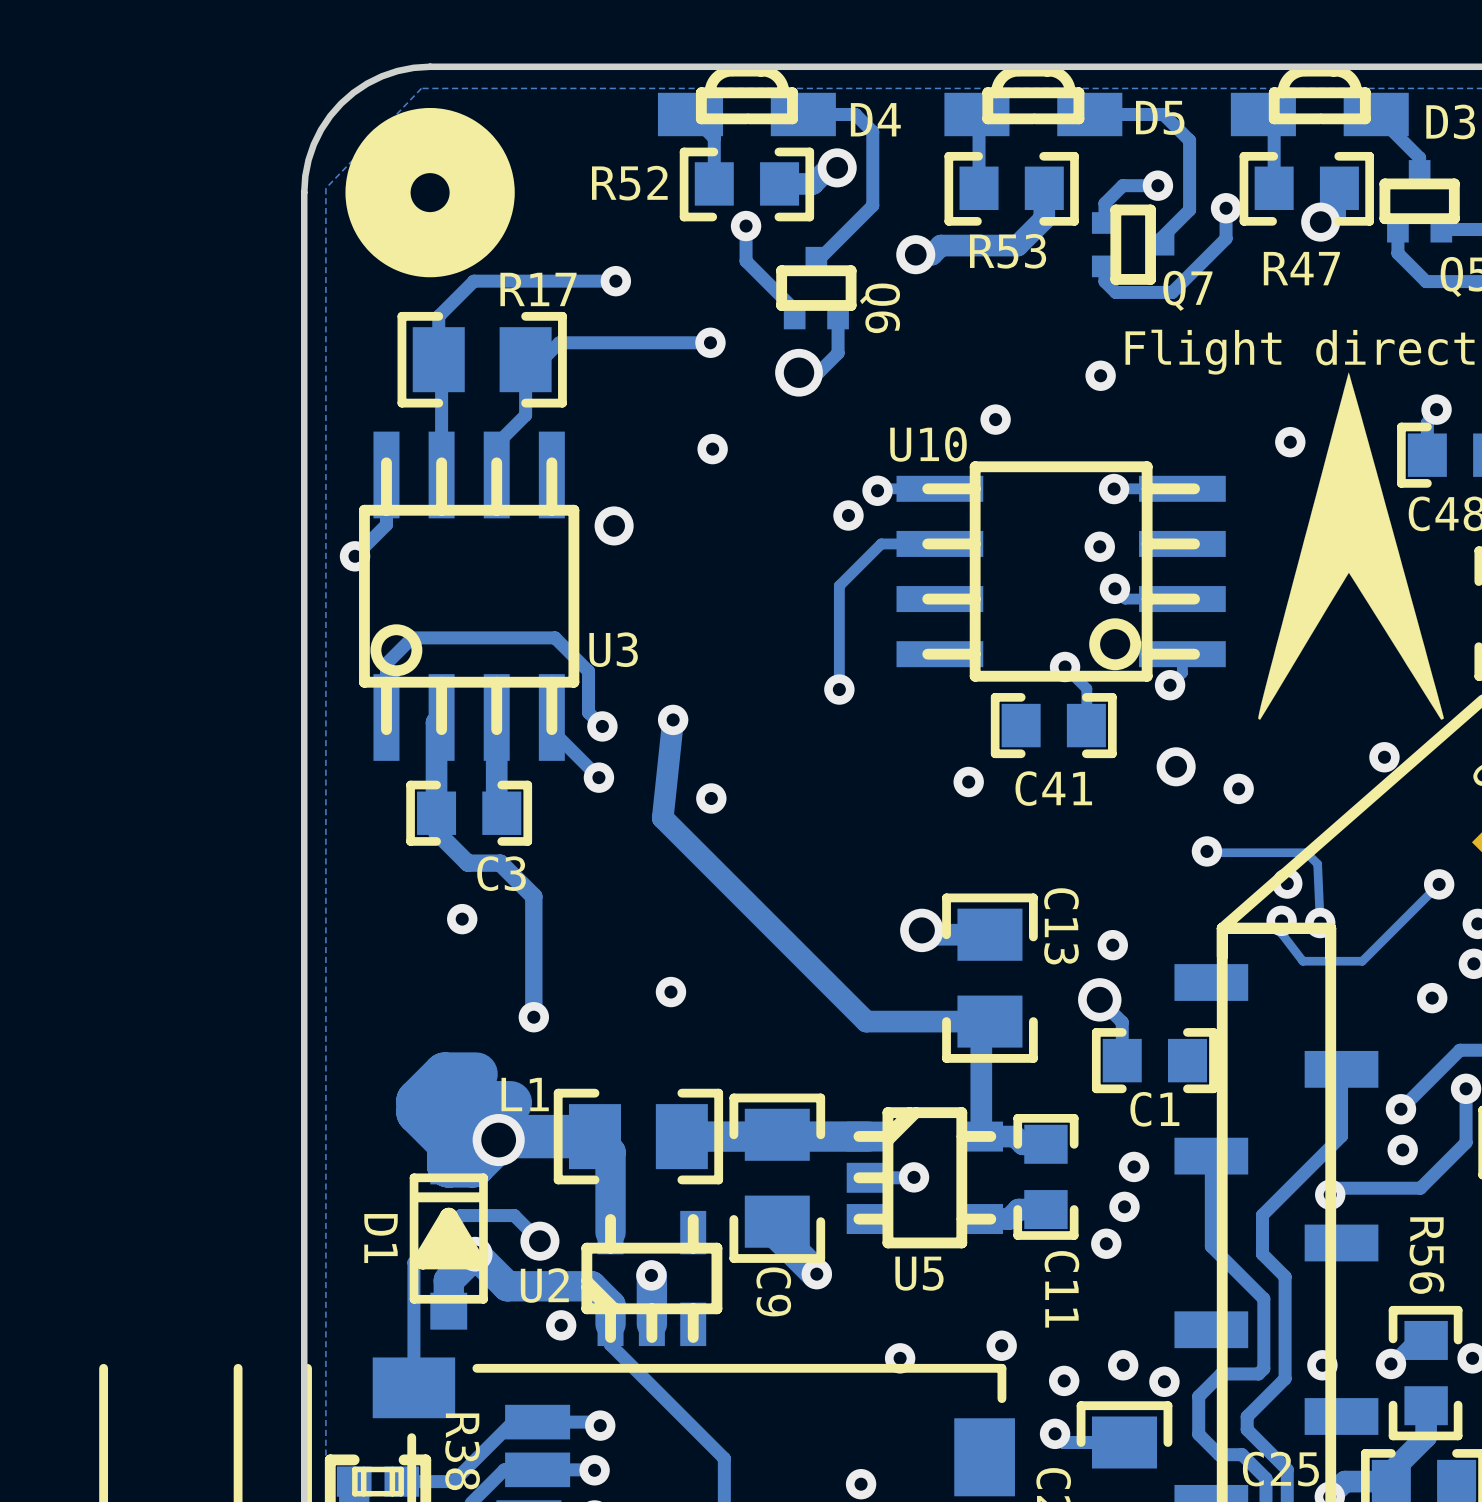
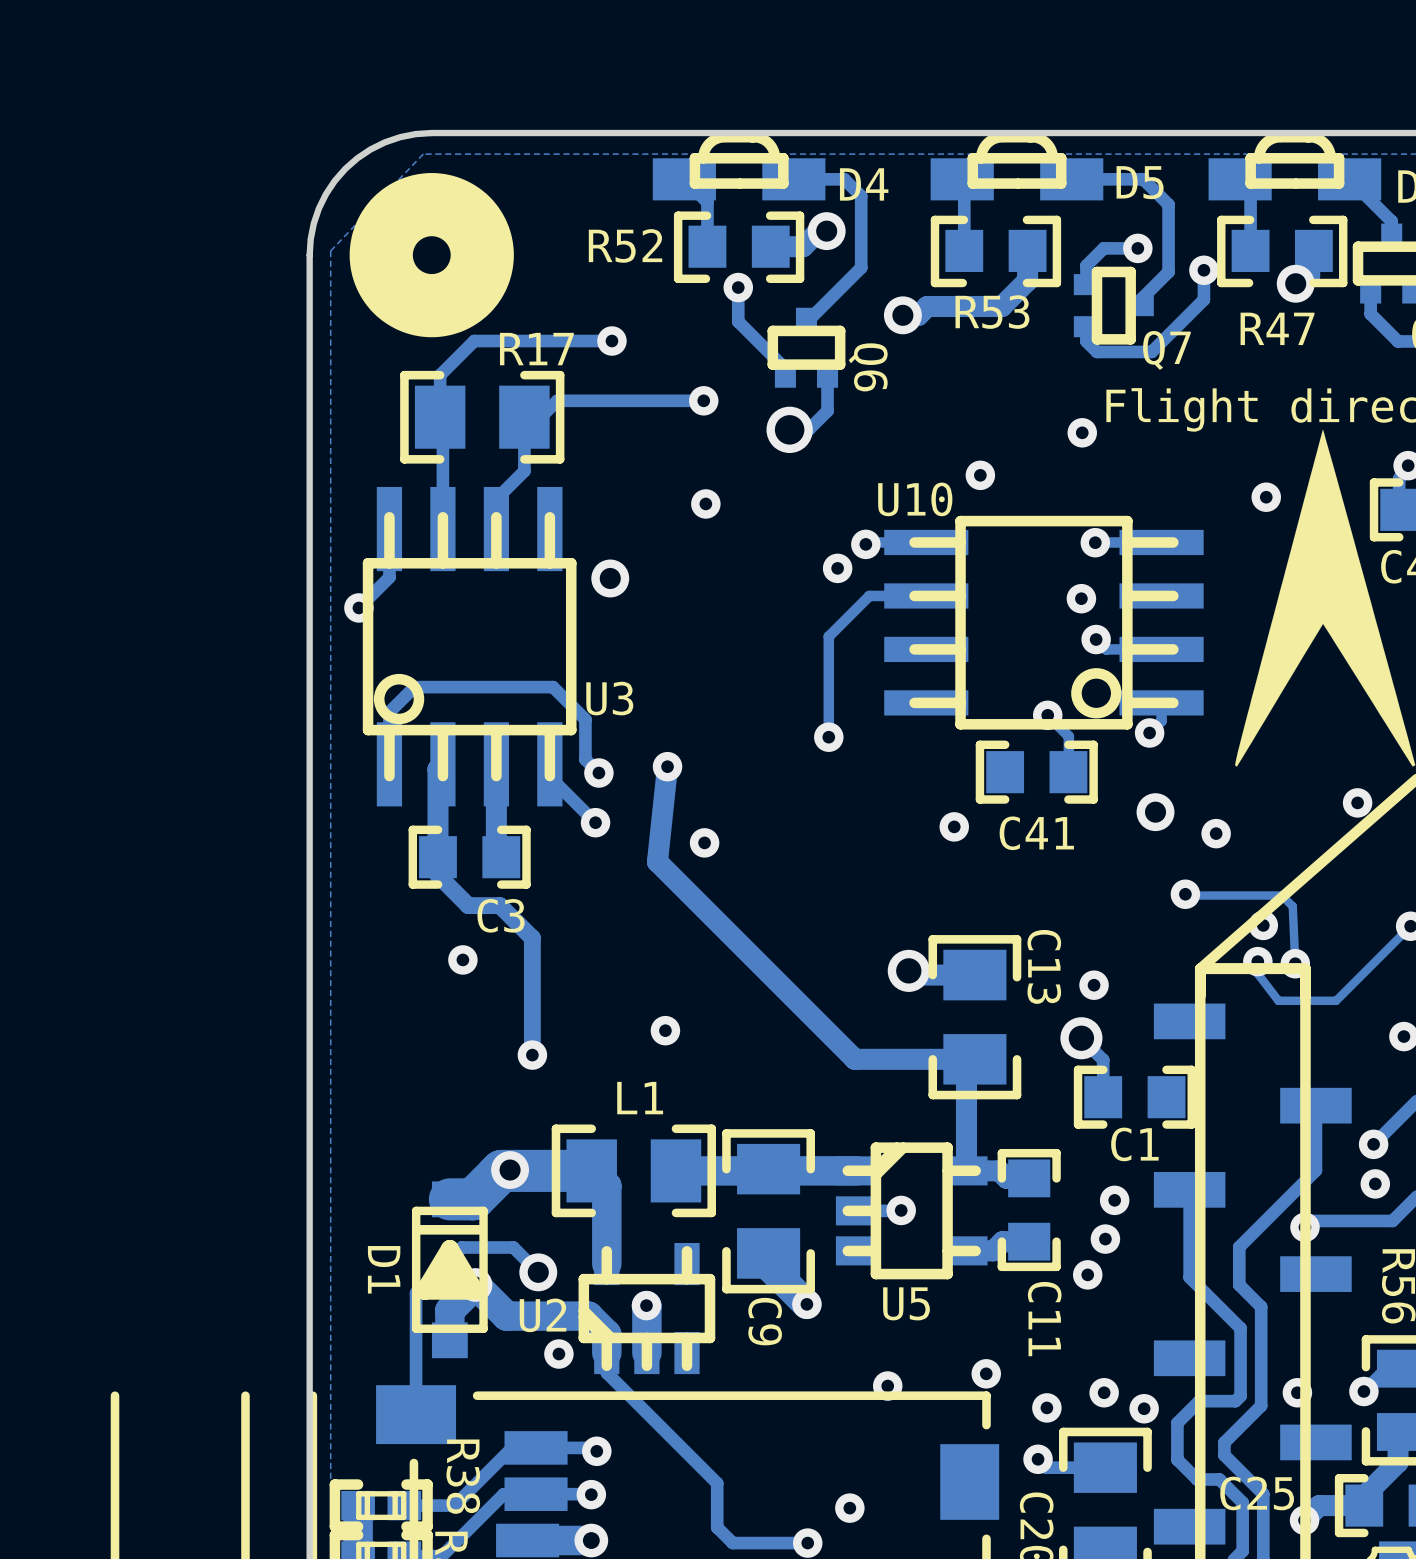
track: (476, 1074) (444, 1074) (417, 1100) (417, 1112) (448, 1143) -> none
L1 name position: L1 (525, 1094) -> L1 (640, 1098)
track: (510, 1102) (475, 1102) (448, 1129) (448, 1165) -> none
via size: [472, 1114, 525, 1167] -> [491, 1151, 530, 1189]

